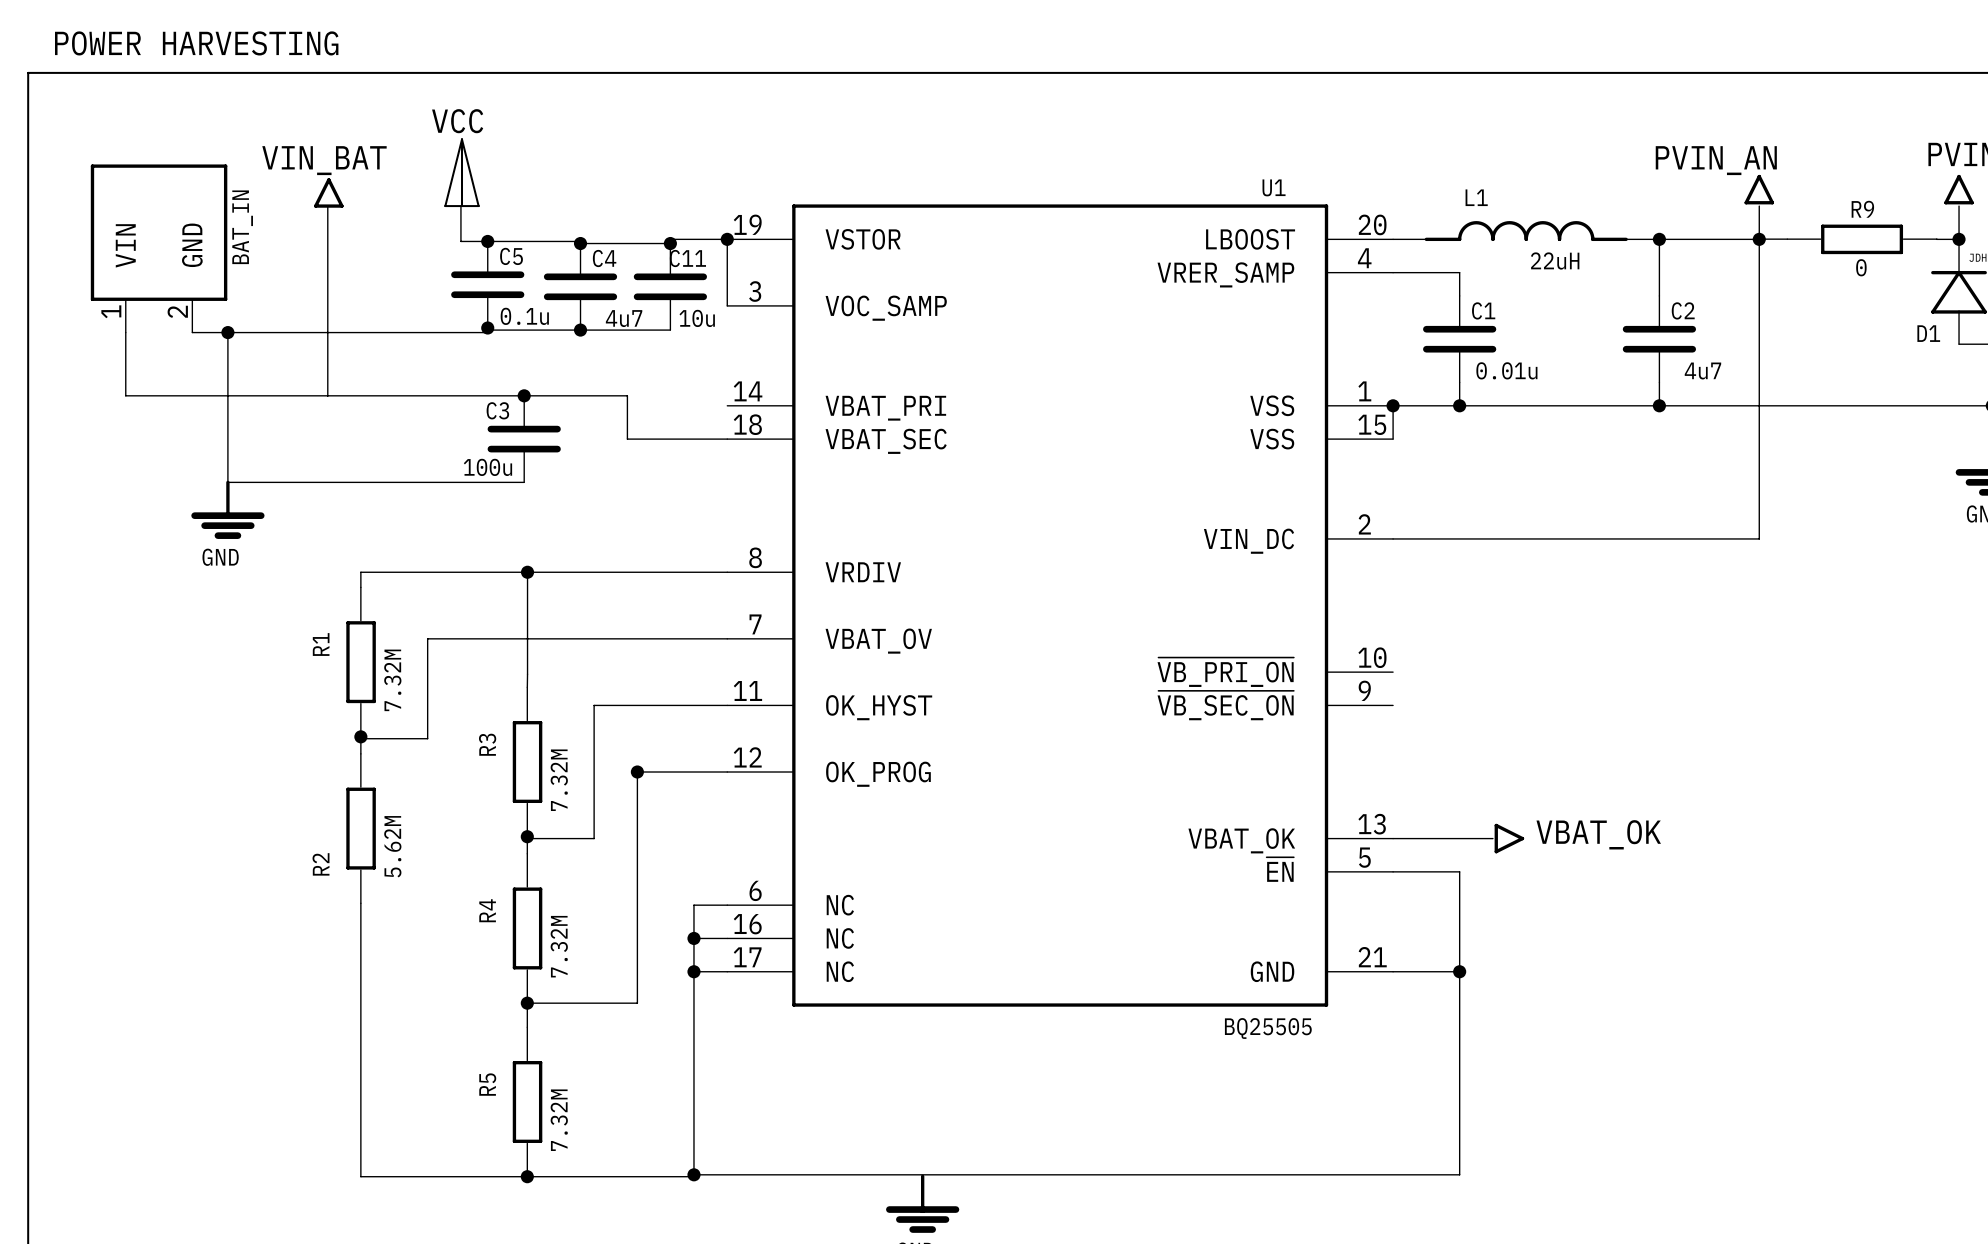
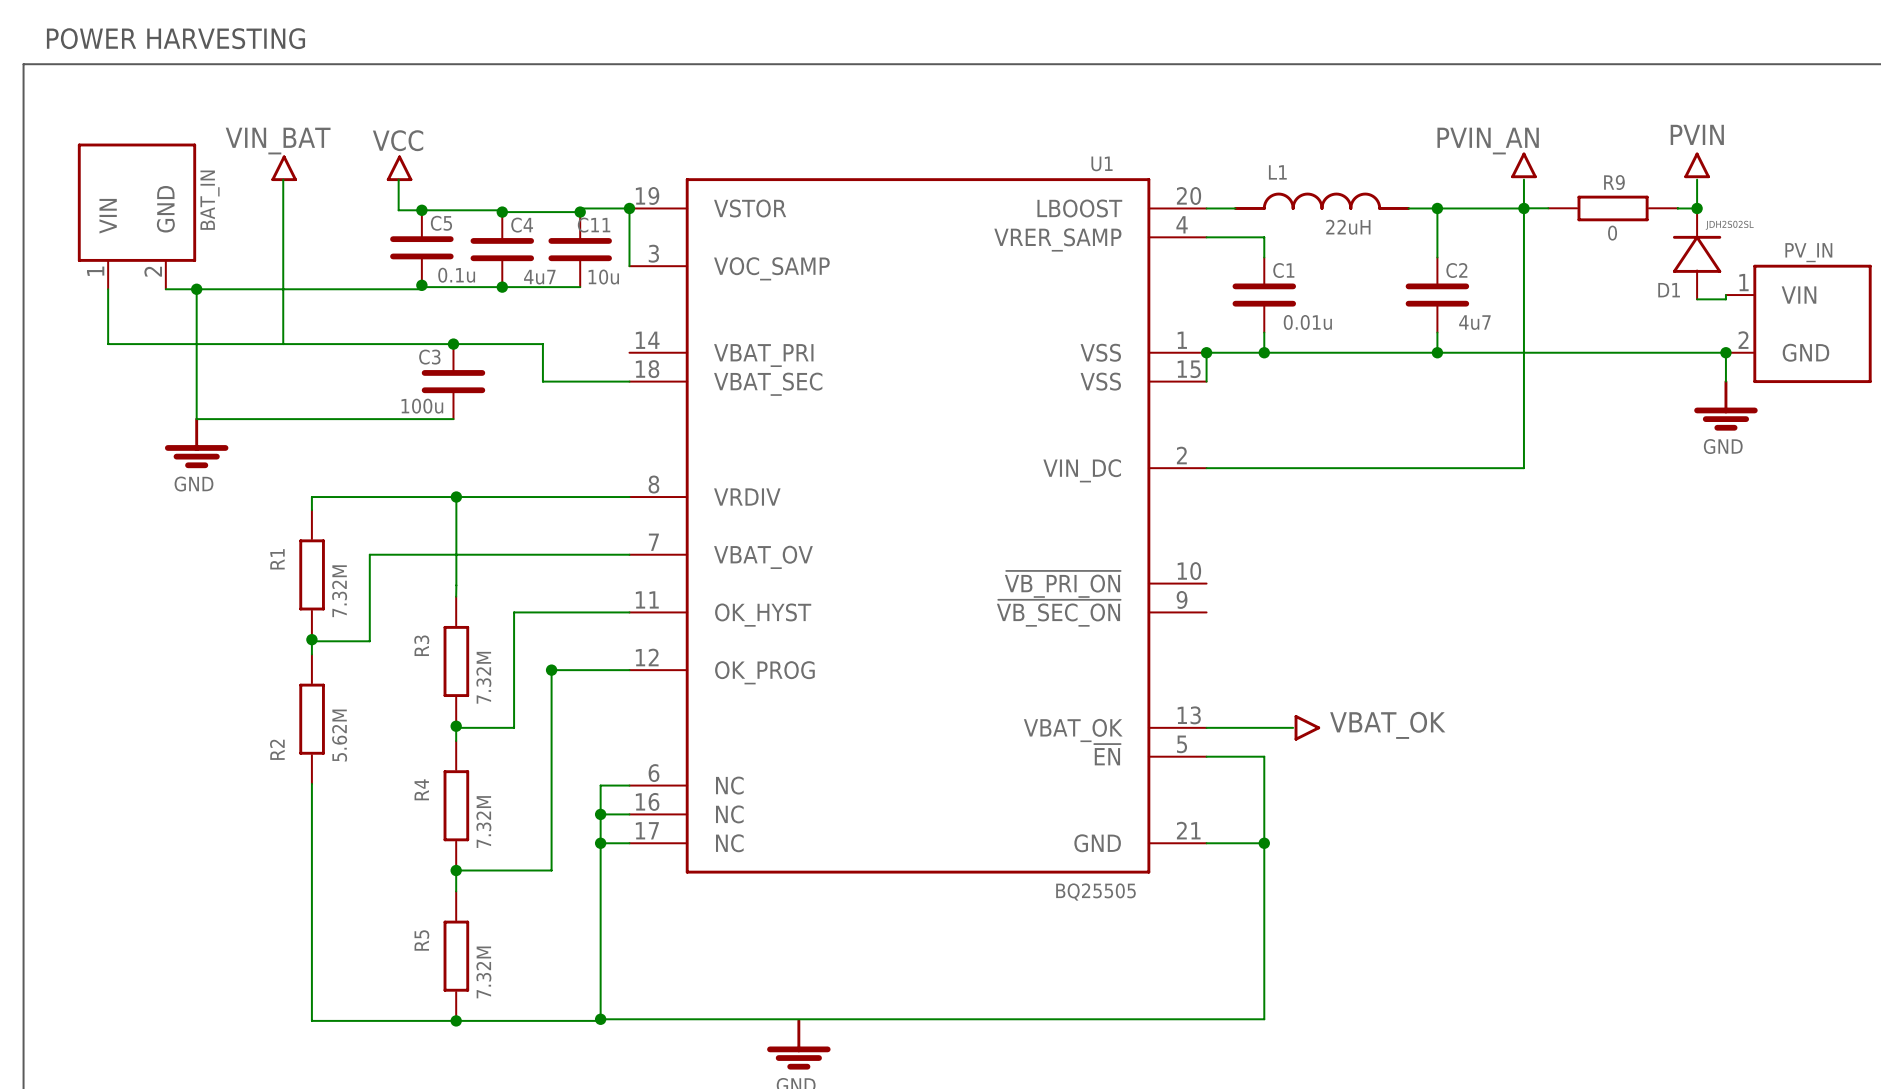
label position: VCC (457, 121) -> VCC (398, 140)
part: (462, 172) -> none
part: none -> (399, 168)

